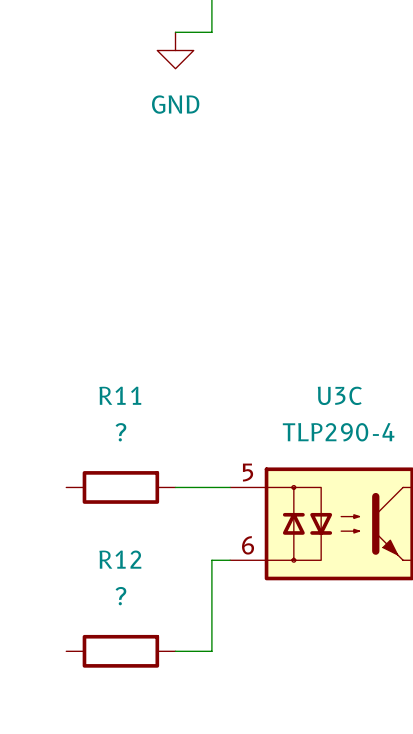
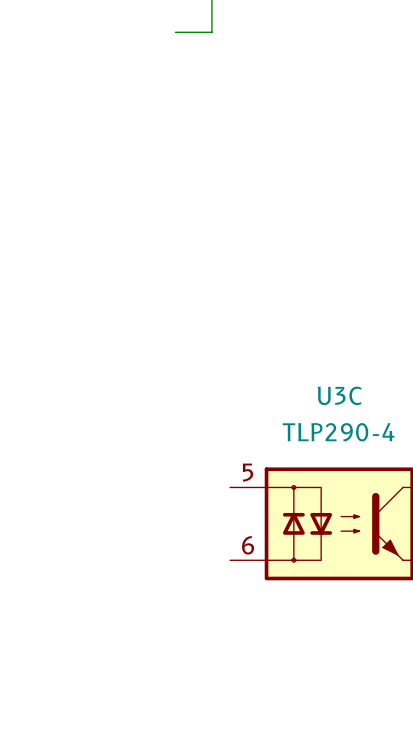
power symbol: GND (175, 50) -> none
R11: ? (120, 487) -> none
wire: (175, 487) (230, 487) -> none
wire: (230, 560) (211, 560) (211, 651) (175, 651) -> none
R12: ? (120, 651) -> none

